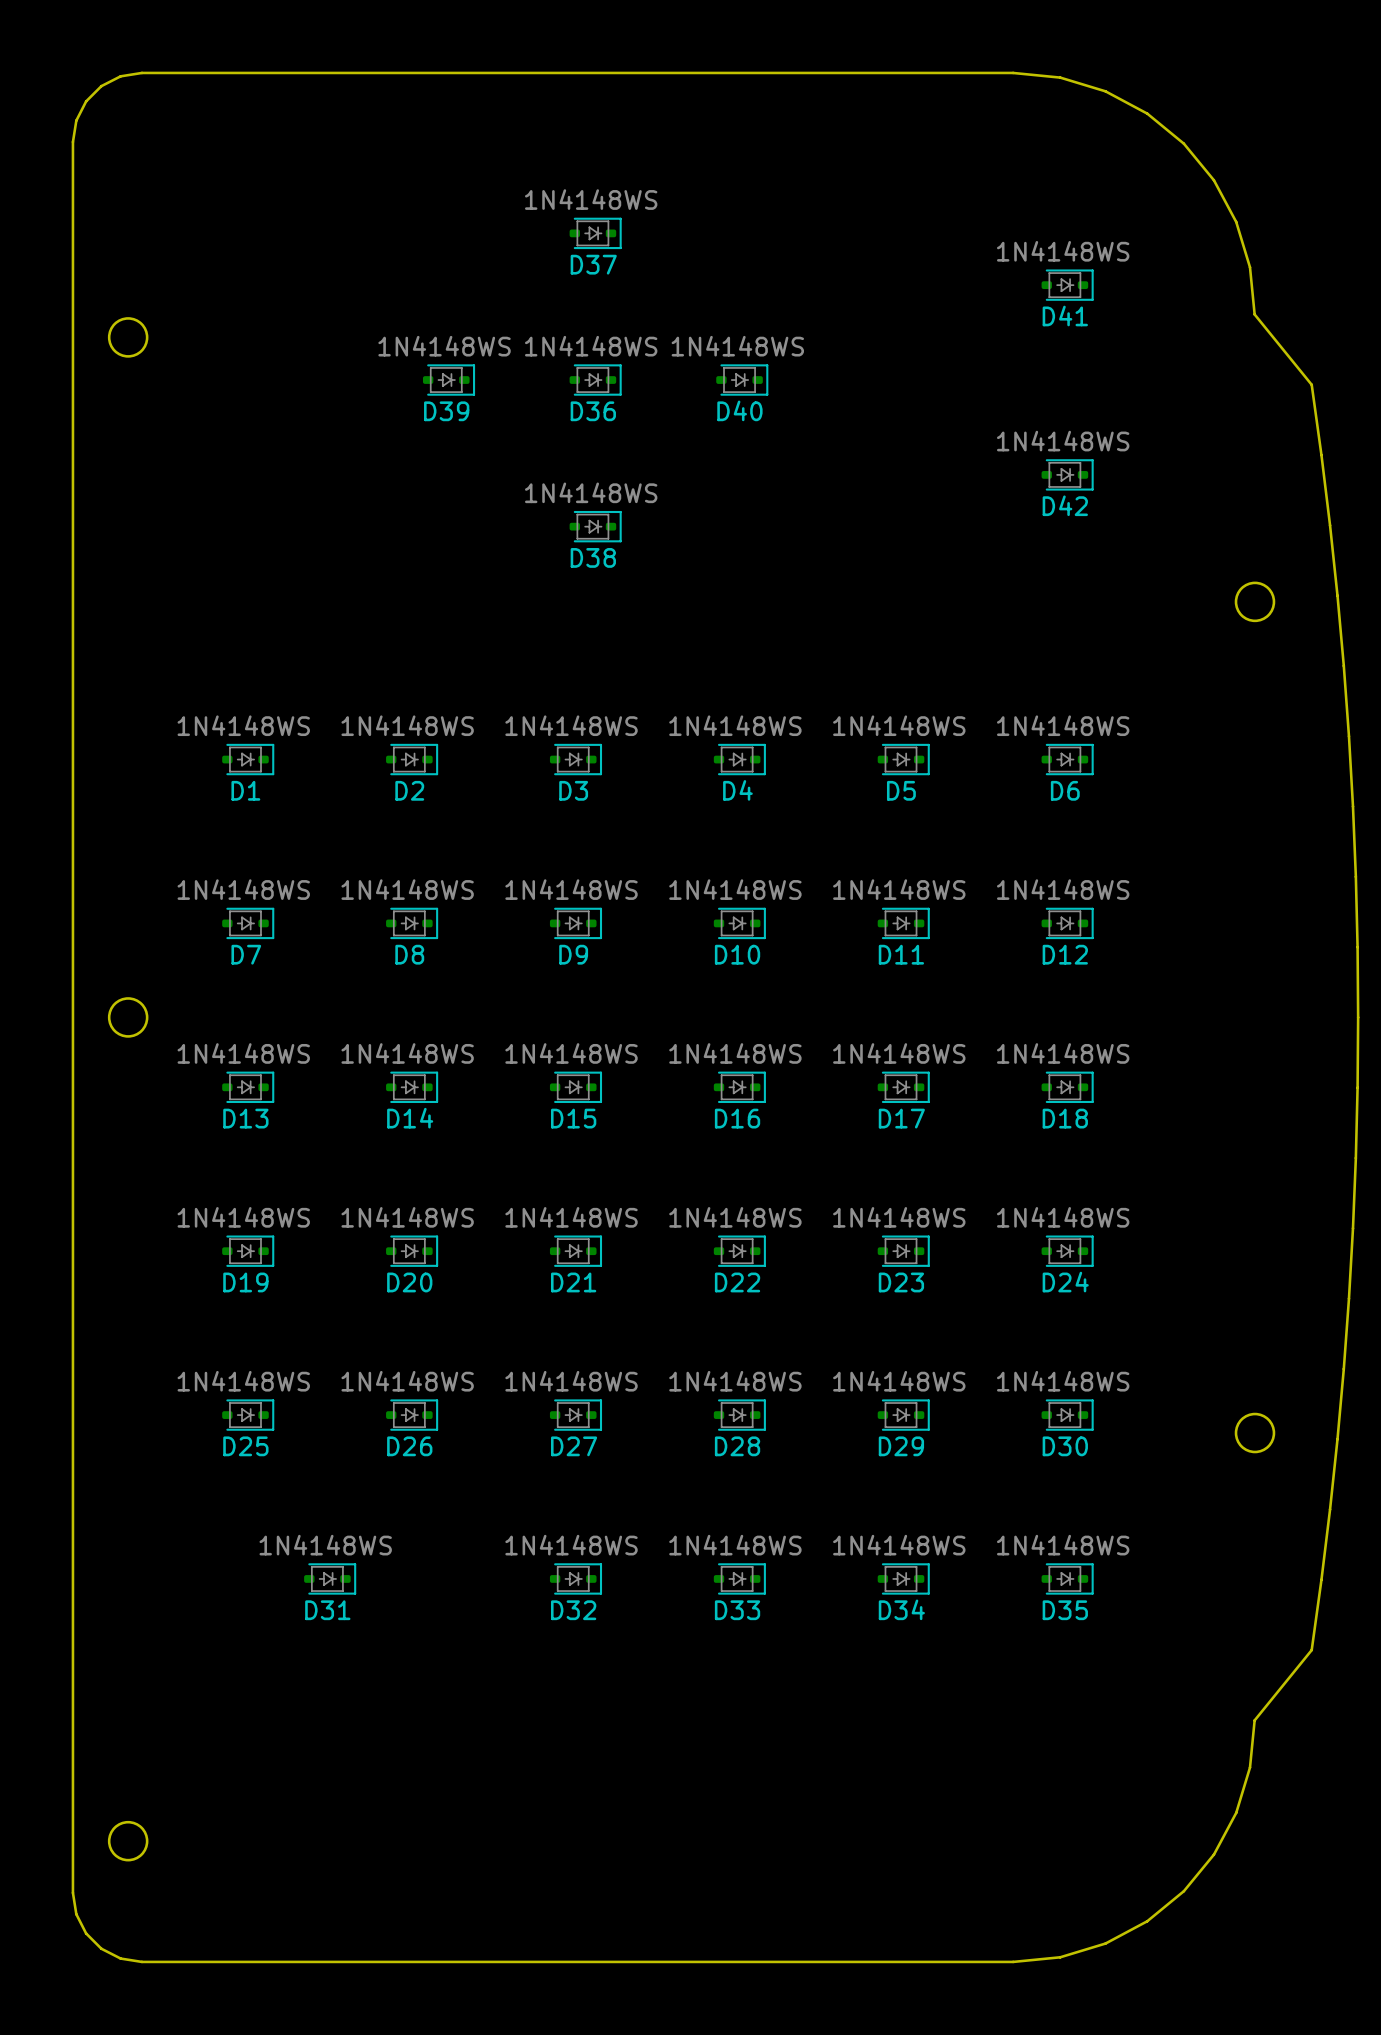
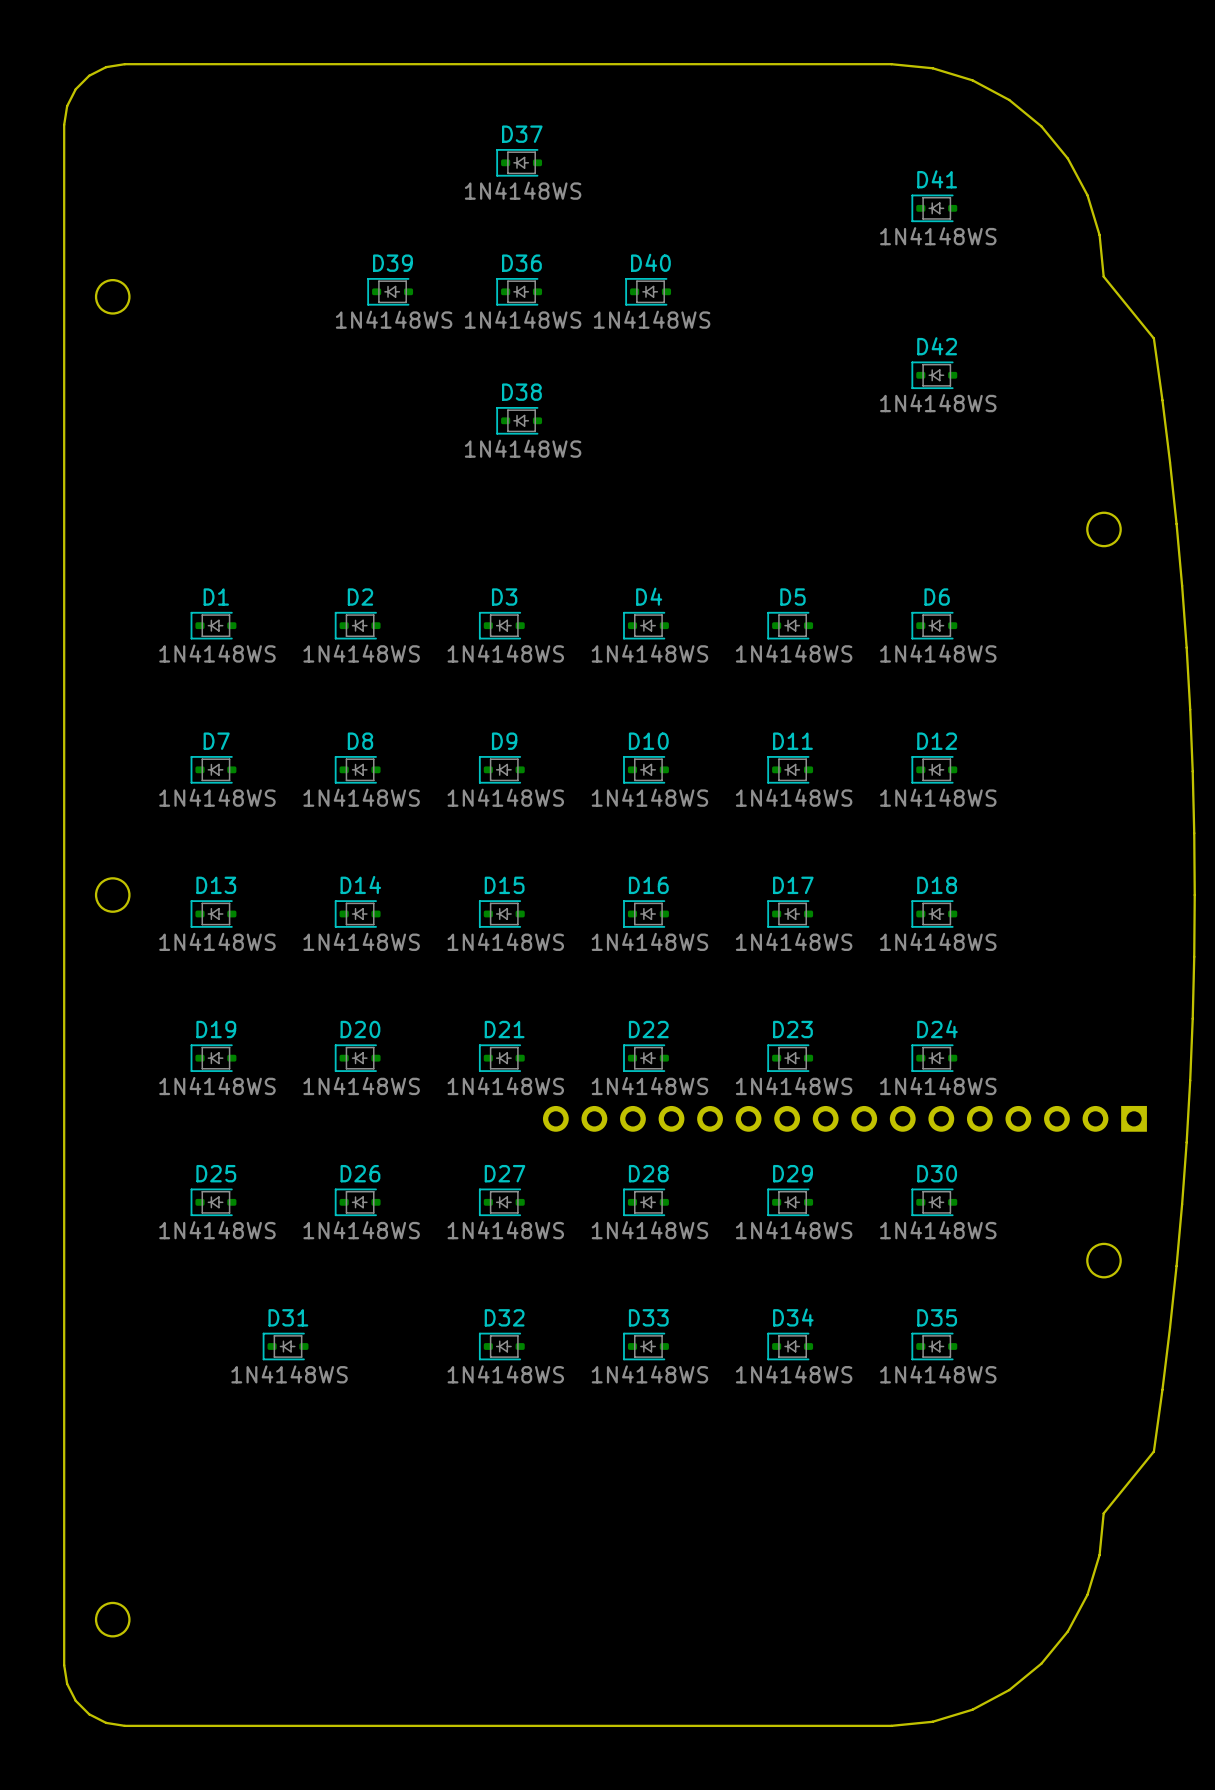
D37 rotation: 0° (595, 233) -> 180° (519, 162)
D37 position: (595, 233) -> (519, 162)
D41 rotation: 0° (1067, 285) -> 180° (934, 208)
D41 position: (1067, 285) -> (934, 208)
D39 rotation: 0° (449, 380) -> 180° (390, 291)
D39 position: (449, 380) -> (390, 291)
D36 rotation: 0° (595, 380) -> 180° (519, 291)
D36 position: (595, 380) -> (519, 291)
D40 rotation: 0° (742, 380) -> 180° (648, 291)
D40 position: (742, 380) -> (648, 291)
D42 rotation: 0° (1067, 474) -> 180° (934, 375)
D42 position: (1067, 474) -> (934, 375)
D38 rotation: 0° (595, 526) -> 180° (519, 420)
D38 position: (595, 526) -> (519, 420)
D1 rotation: 0° (248, 759) -> 180° (213, 625)
D1 position: (248, 759) -> (213, 625)
D2 rotation: 0° (412, 759) -> 180° (357, 625)
D2 position: (412, 759) -> (357, 625)
D3 rotation: 0° (575, 759) -> 180° (501, 625)
D3 position: (575, 759) -> (501, 625)
D4 rotation: 0° (739, 759) -> 180° (646, 625)
D4 position: (739, 759) -> (646, 625)
D5 rotation: 0° (903, 759) -> 180° (790, 625)
D5 position: (903, 759) -> (790, 625)
D6 rotation: 0° (1067, 759) -> 180° (934, 625)
D6 position: (1067, 759) -> (934, 625)
D7 rotation: 0° (248, 923) -> 180° (213, 769)
D7 position: (248, 923) -> (213, 769)
D8 rotation: 0° (412, 923) -> 180° (357, 769)
D8 position: (412, 923) -> (357, 769)
D9 rotation: 0° (575, 923) -> 180° (501, 769)
D9 position: (575, 923) -> (501, 769)
D10 rotation: 0° (739, 923) -> 180° (646, 769)
D10 position: (739, 923) -> (646, 769)
D11 rotation: 0° (903, 923) -> 180° (790, 769)
D11 position: (903, 923) -> (790, 769)
D12 rotation: 0° (1067, 923) -> 180° (934, 769)
D12 position: (1067, 923) -> (934, 769)
D13 rotation: 0° (248, 1087) -> 180° (213, 913)
D13 position: (248, 1087) -> (213, 913)
D14 rotation: 0° (412, 1087) -> 180° (357, 913)
D14 position: (412, 1087) -> (357, 913)
D15 rotation: 0° (575, 1087) -> 180° (501, 913)
D15 position: (575, 1087) -> (501, 913)
D16 rotation: 0° (739, 1087) -> 180° (646, 913)
D16 position: (739, 1087) -> (646, 913)
D17 rotation: 0° (903, 1087) -> 180° (790, 913)
D17 position: (903, 1087) -> (790, 913)
D18 rotation: 0° (1067, 1087) -> 180° (934, 913)
D18 position: (1067, 1087) -> (934, 913)
D19 rotation: 0° (248, 1251) -> 180° (213, 1058)
D19 position: (248, 1251) -> (213, 1058)
D20 rotation: 0° (412, 1251) -> 180° (357, 1058)
D20 position: (412, 1251) -> (357, 1058)
D21 rotation: 0° (575, 1251) -> 180° (501, 1058)
D21 position: (575, 1251) -> (501, 1058)
D22 rotation: 0° (739, 1251) -> 180° (646, 1058)
D22 position: (739, 1251) -> (646, 1058)
D23 rotation: 0° (903, 1251) -> 180° (790, 1058)
D23 position: (903, 1251) -> (790, 1058)
D24 rotation: 0° (1067, 1251) -> 180° (934, 1058)
D24 position: (1067, 1251) -> (934, 1058)
part: none -> (844, 1118)
D25 rotation: 0° (248, 1415) -> 180° (213, 1202)
D25 position: (248, 1415) -> (213, 1202)
D26 rotation: 0° (412, 1415) -> 180° (357, 1202)
D26 position: (412, 1415) -> (357, 1202)
D27 rotation: 0° (575, 1415) -> 180° (501, 1202)
D27 position: (575, 1415) -> (501, 1202)
D28 rotation: 0° (739, 1415) -> 180° (646, 1202)
D28 position: (739, 1415) -> (646, 1202)
D29 rotation: 0° (903, 1415) -> 180° (790, 1202)
D29 position: (903, 1415) -> (790, 1202)
D30 rotation: 0° (1067, 1415) -> 180° (934, 1202)
D30 position: (1067, 1415) -> (934, 1202)
D31 rotation: 0° (330, 1578) -> 180° (285, 1346)
D31 position: (330, 1578) -> (285, 1346)
D32 rotation: 0° (575, 1578) -> 180° (501, 1346)
D32 position: (575, 1578) -> (501, 1346)
D33 rotation: 0° (739, 1578) -> 180° (646, 1346)
D33 position: (739, 1578) -> (646, 1346)
D34 rotation: 0° (903, 1578) -> 180° (790, 1346)
D34 position: (903, 1578) -> (790, 1346)
D35 rotation: 0° (1067, 1578) -> 180° (934, 1346)
D35 position: (1067, 1578) -> (934, 1346)

